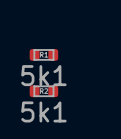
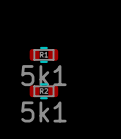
part footprint: [29, 49, 59, 61] -> [29, 46, 59, 63]
part footprint: [29, 85, 59, 98] -> [29, 83, 59, 100]

